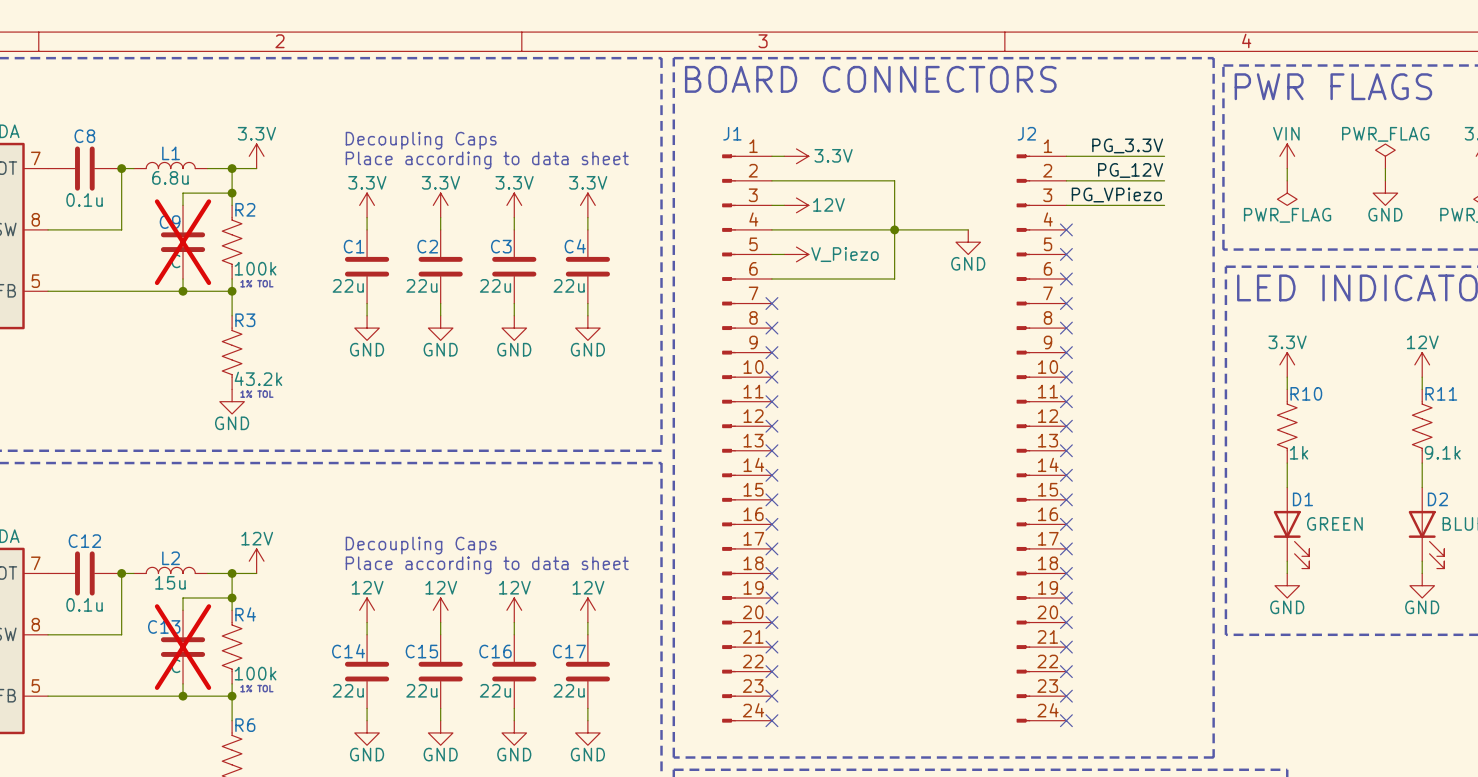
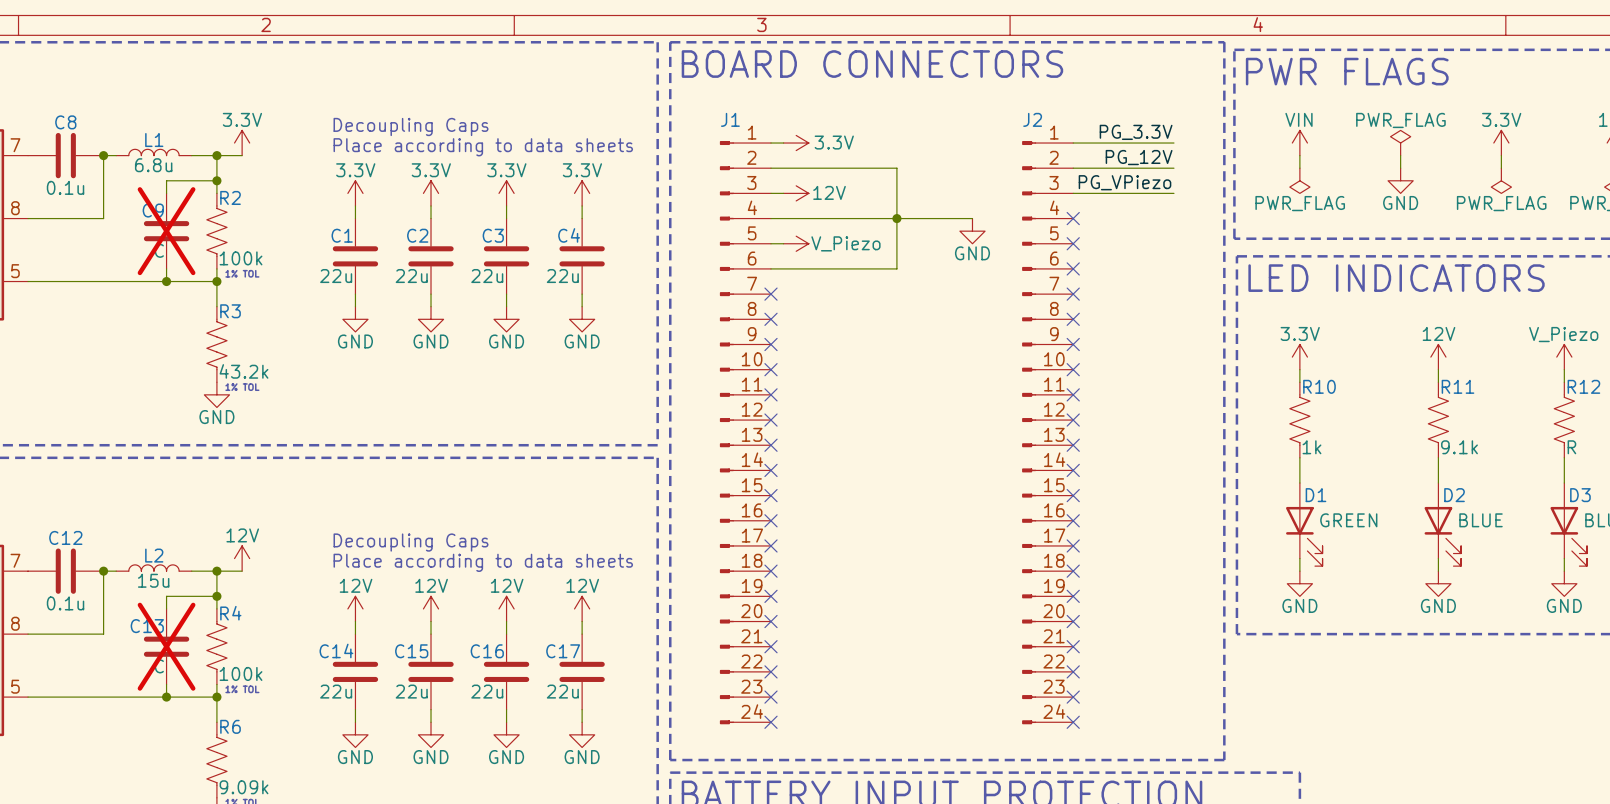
text: Place according to data sheet (487, 160) -> Place according to data sheets (483, 147)
text: Place according to data sheet (487, 565) -> Place according to data sheets (483, 562)

